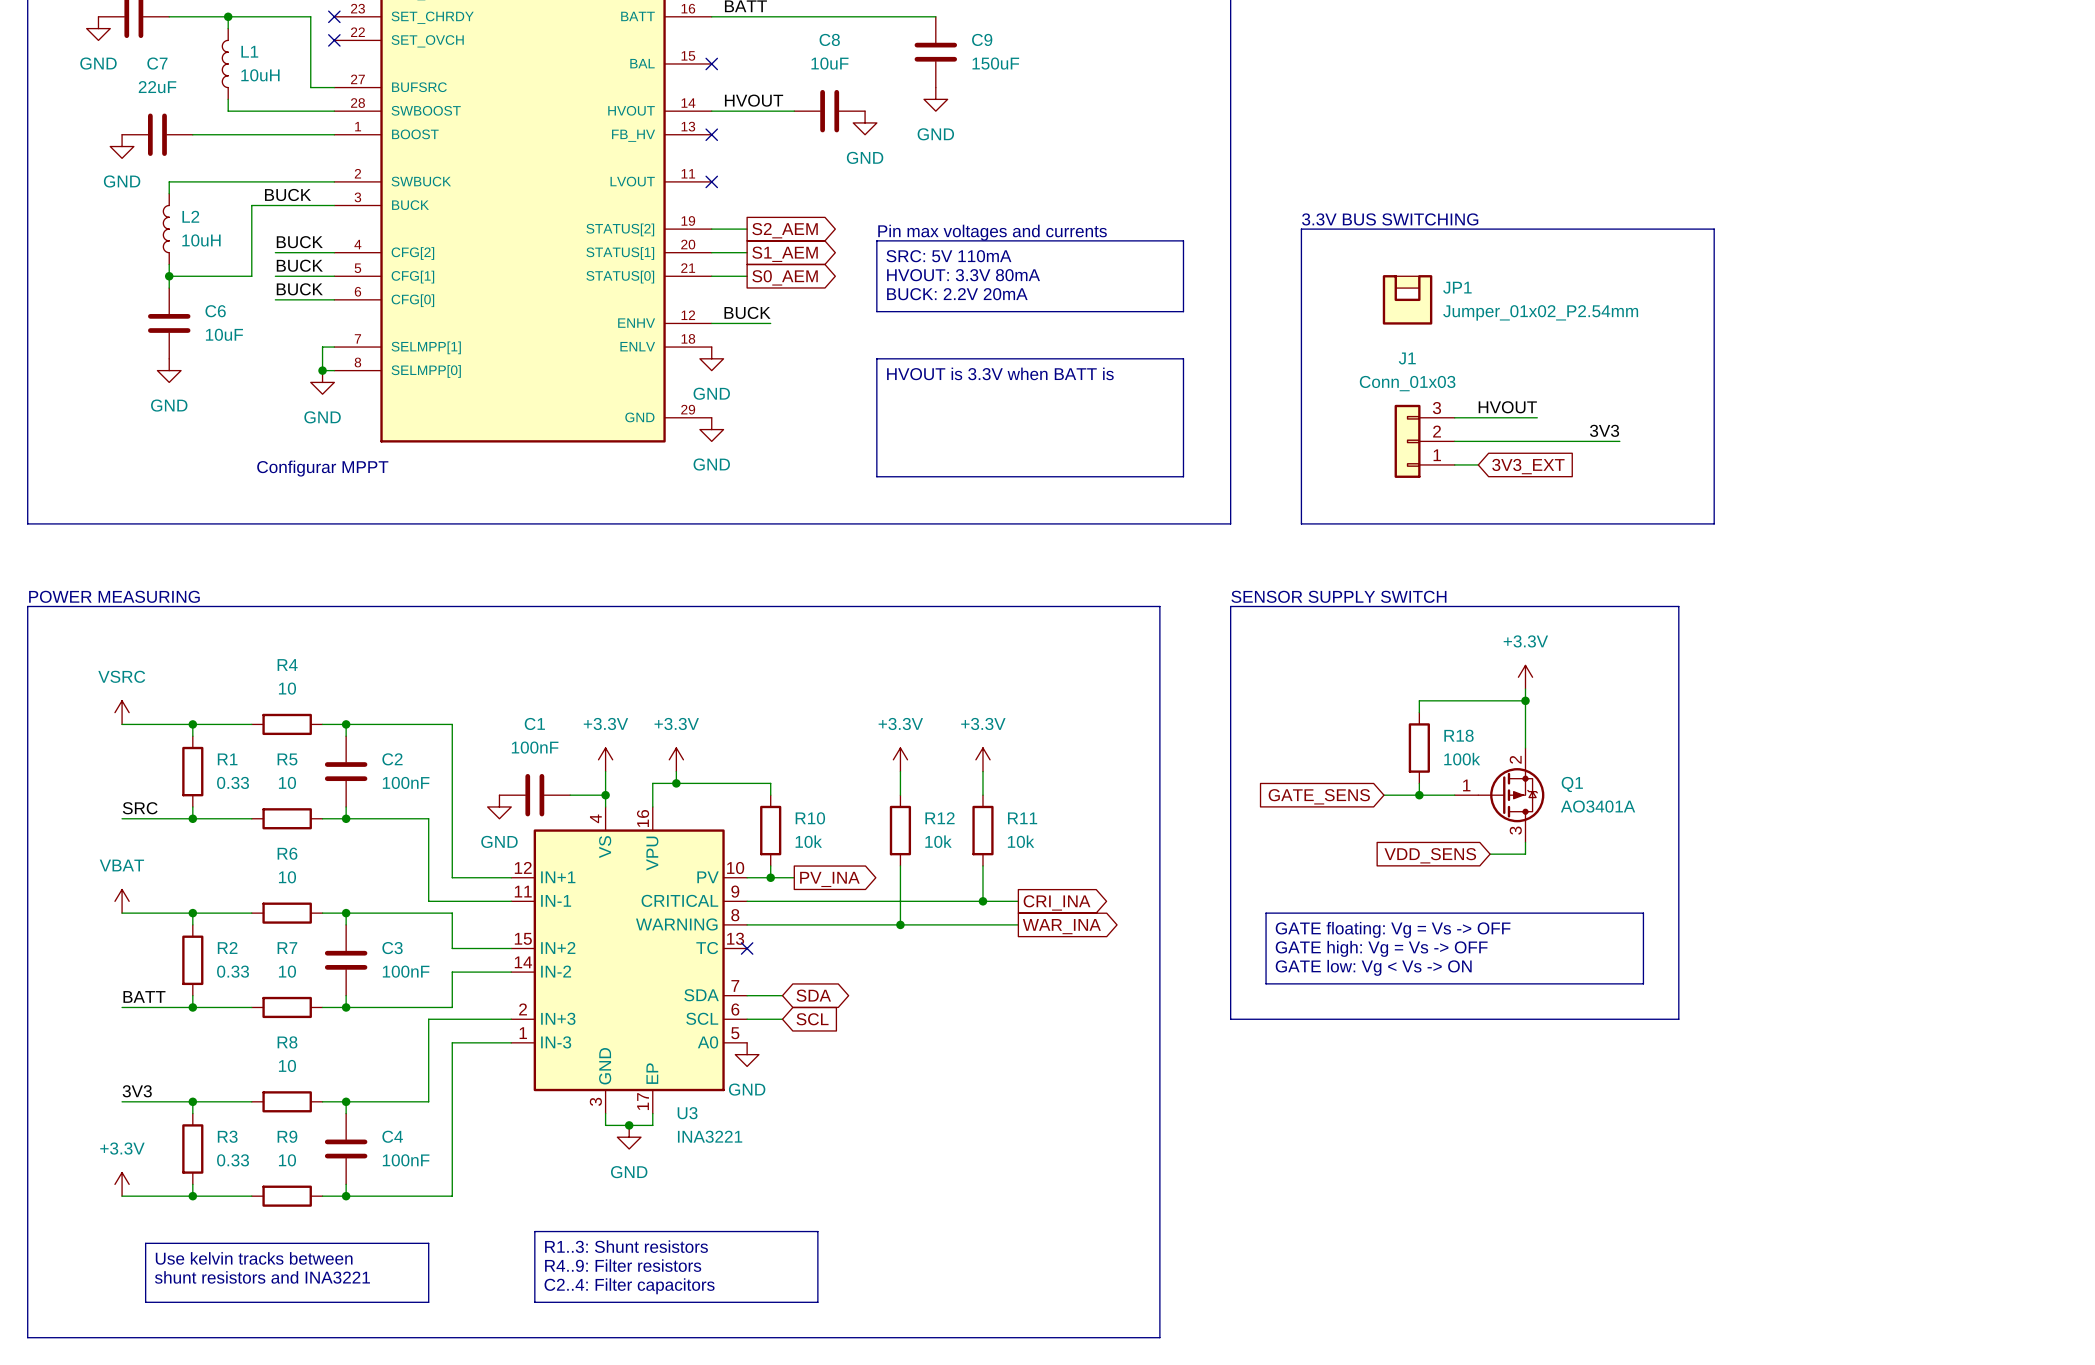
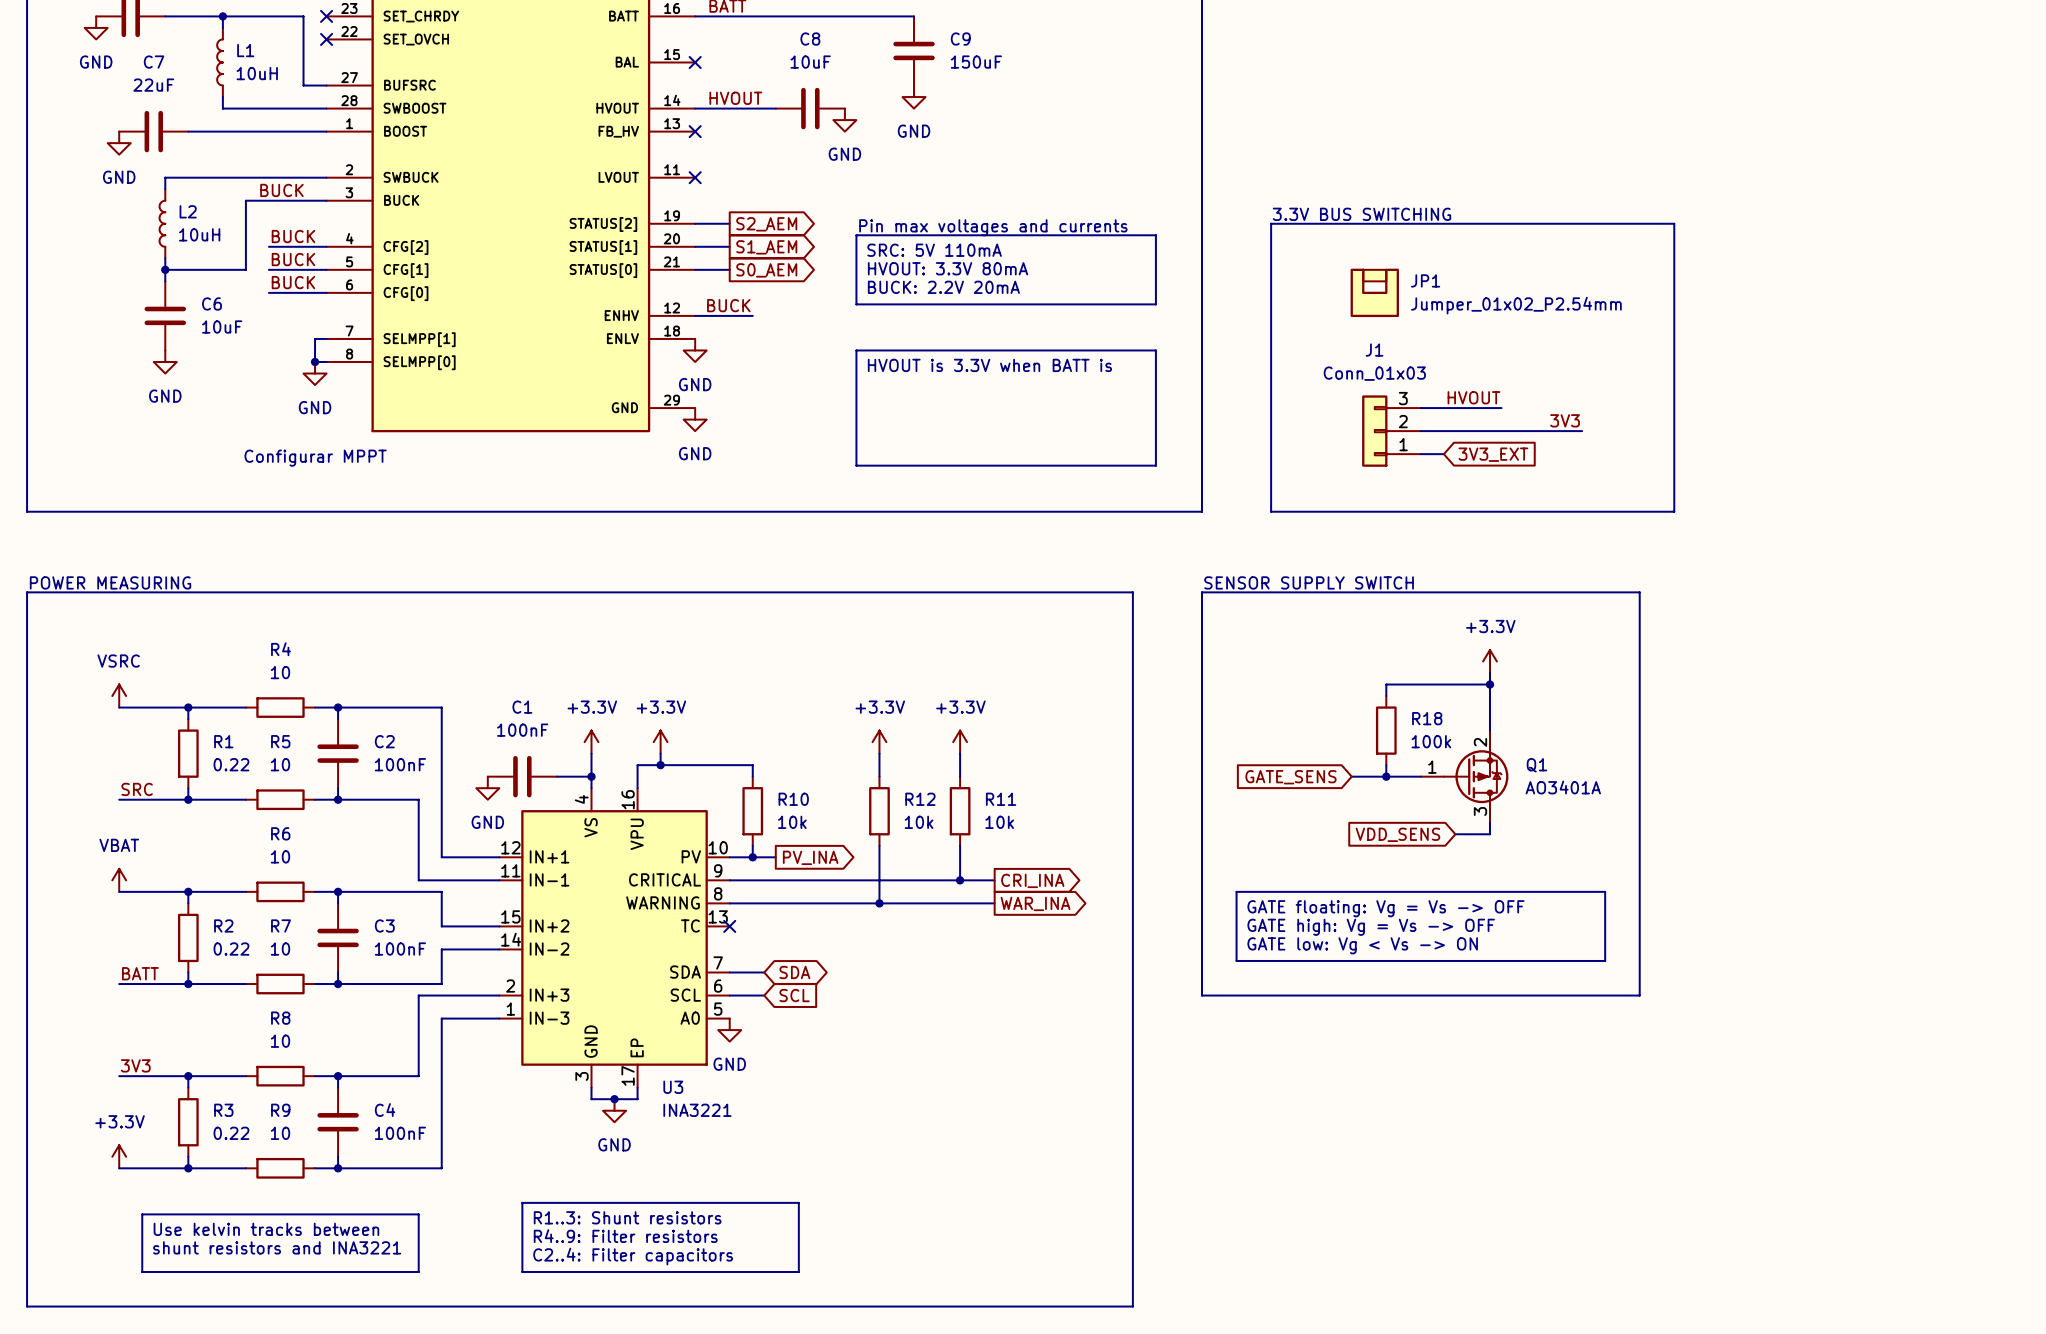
R1 value: 0.33 (233, 782) -> 0.22 (231, 764)
R2 value: 0.33 (233, 971) -> 0.22 (231, 949)
R3 value: 0.33 (233, 1160) -> 0.22 (231, 1133)

